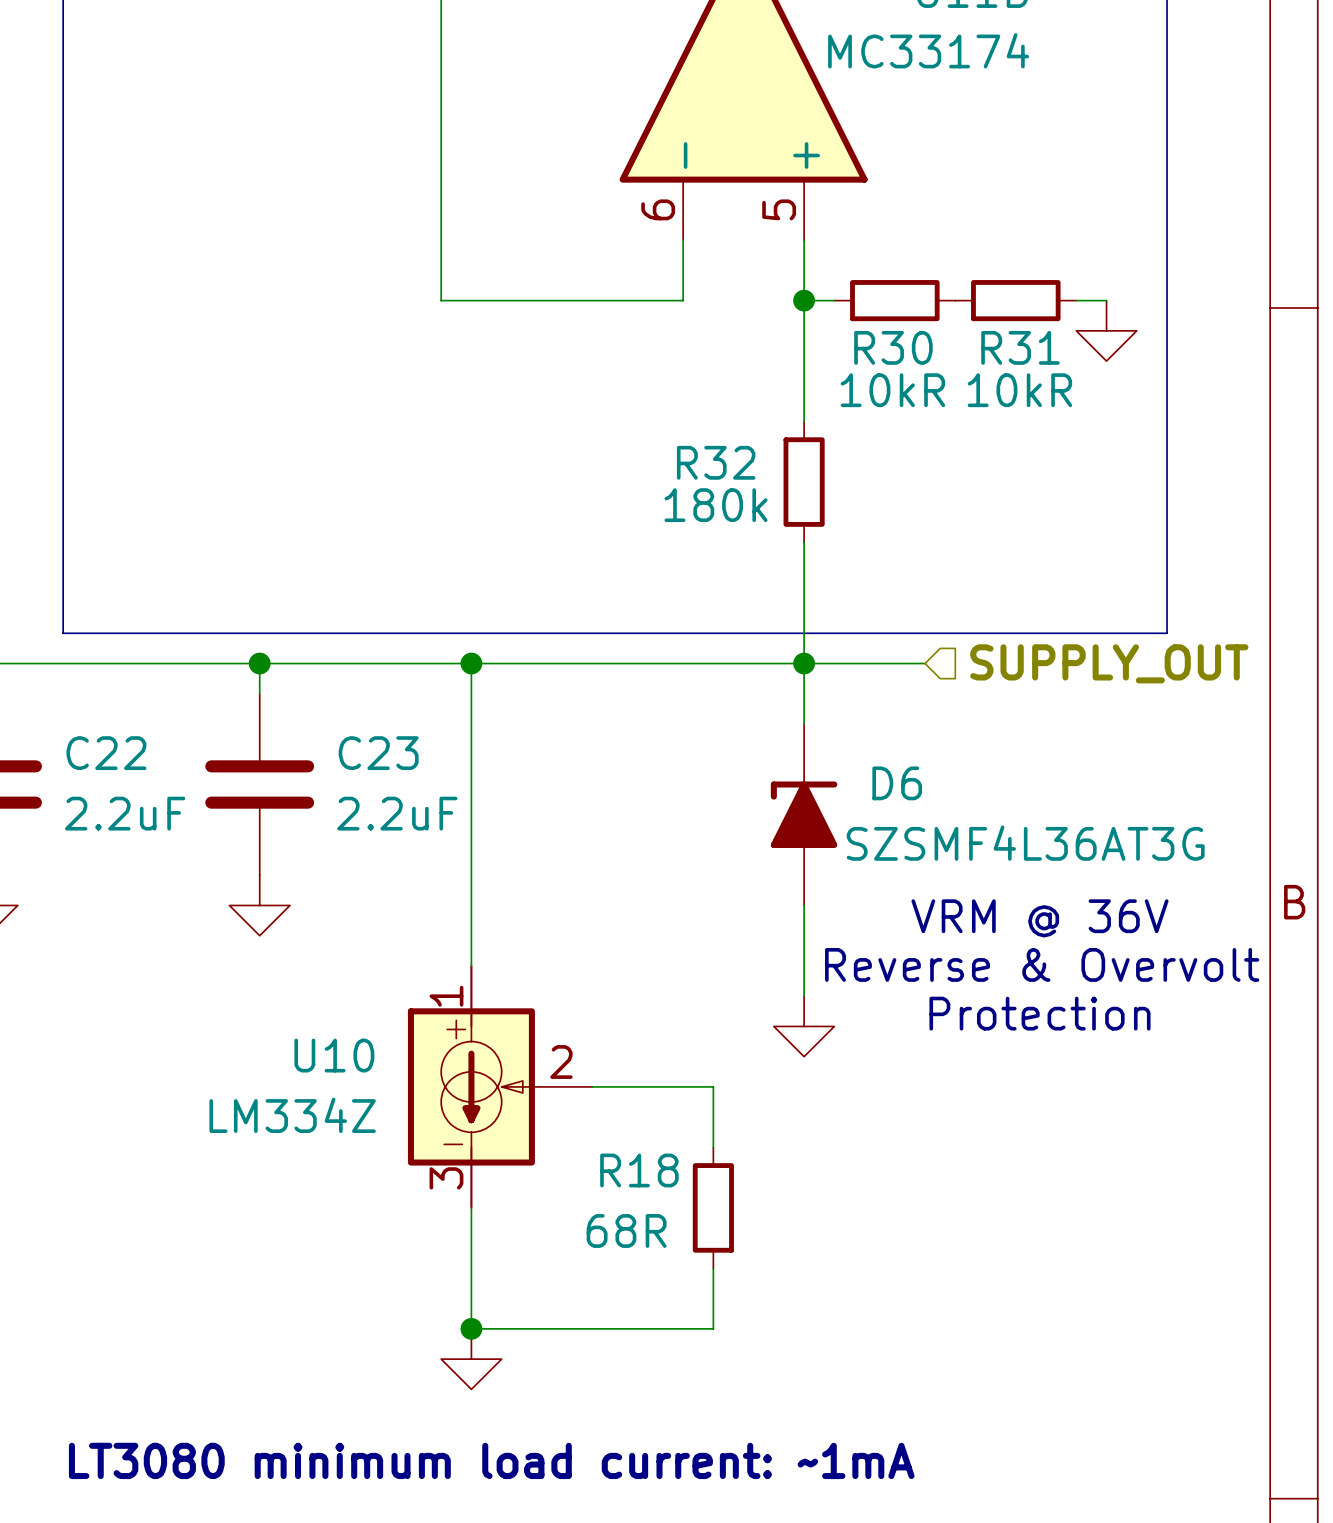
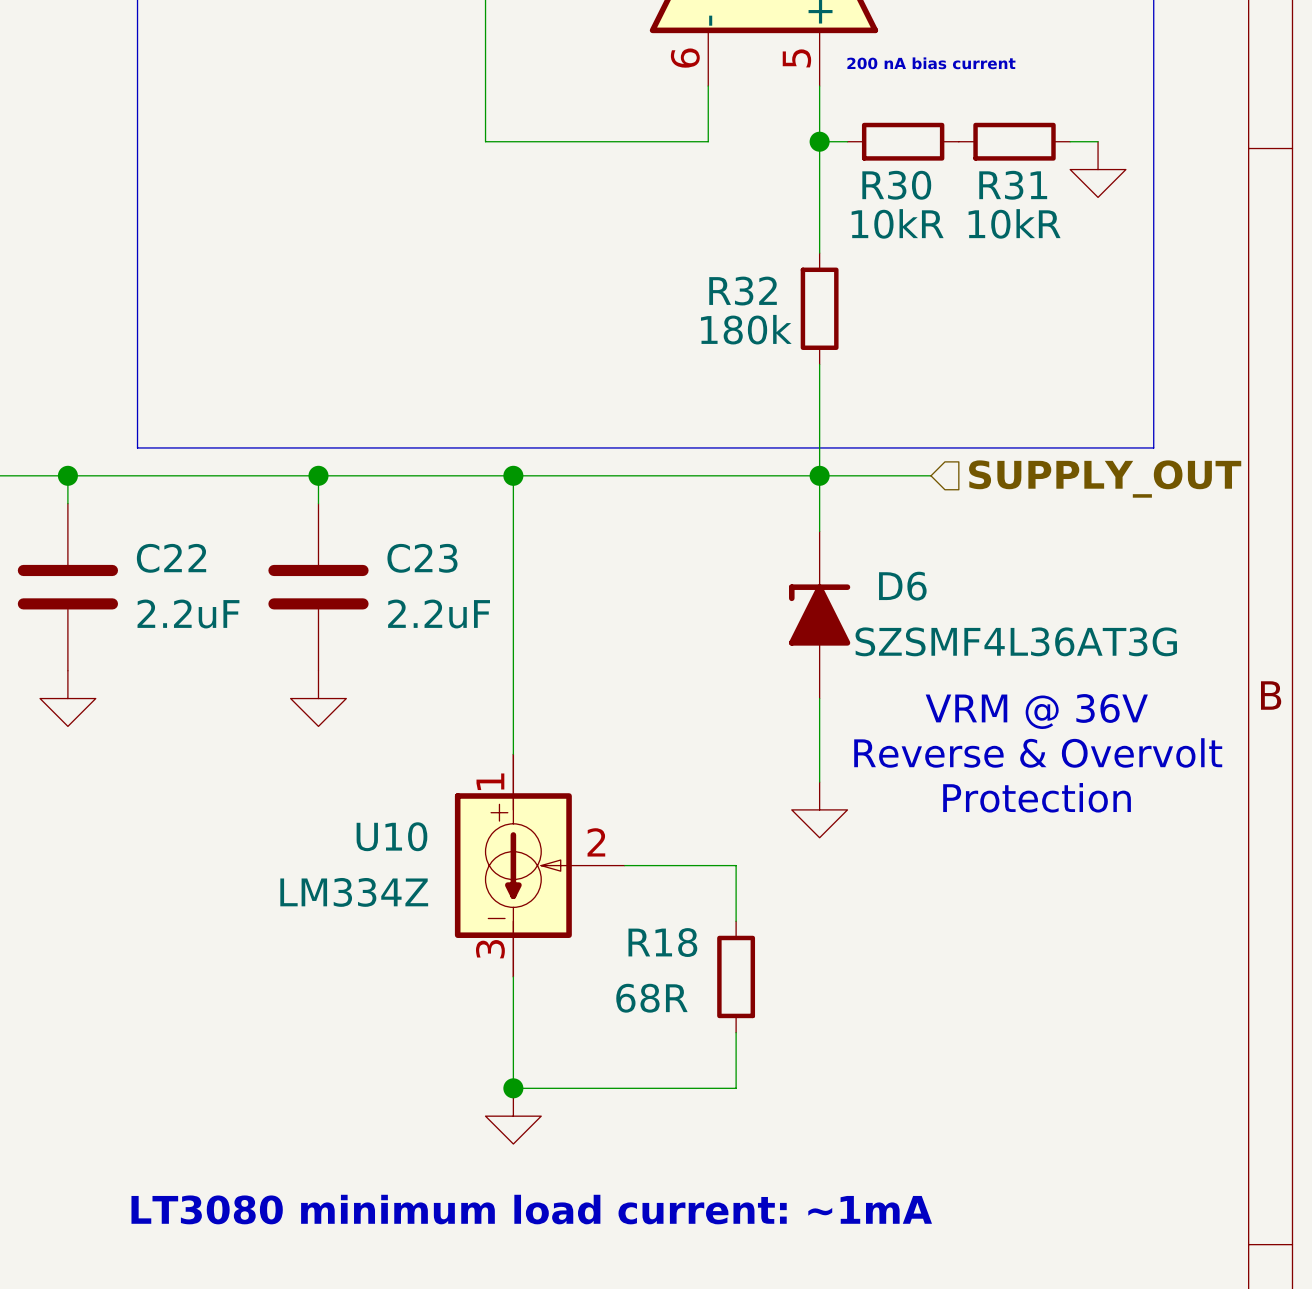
text: none -> 200 nA bias current (931, 63)

